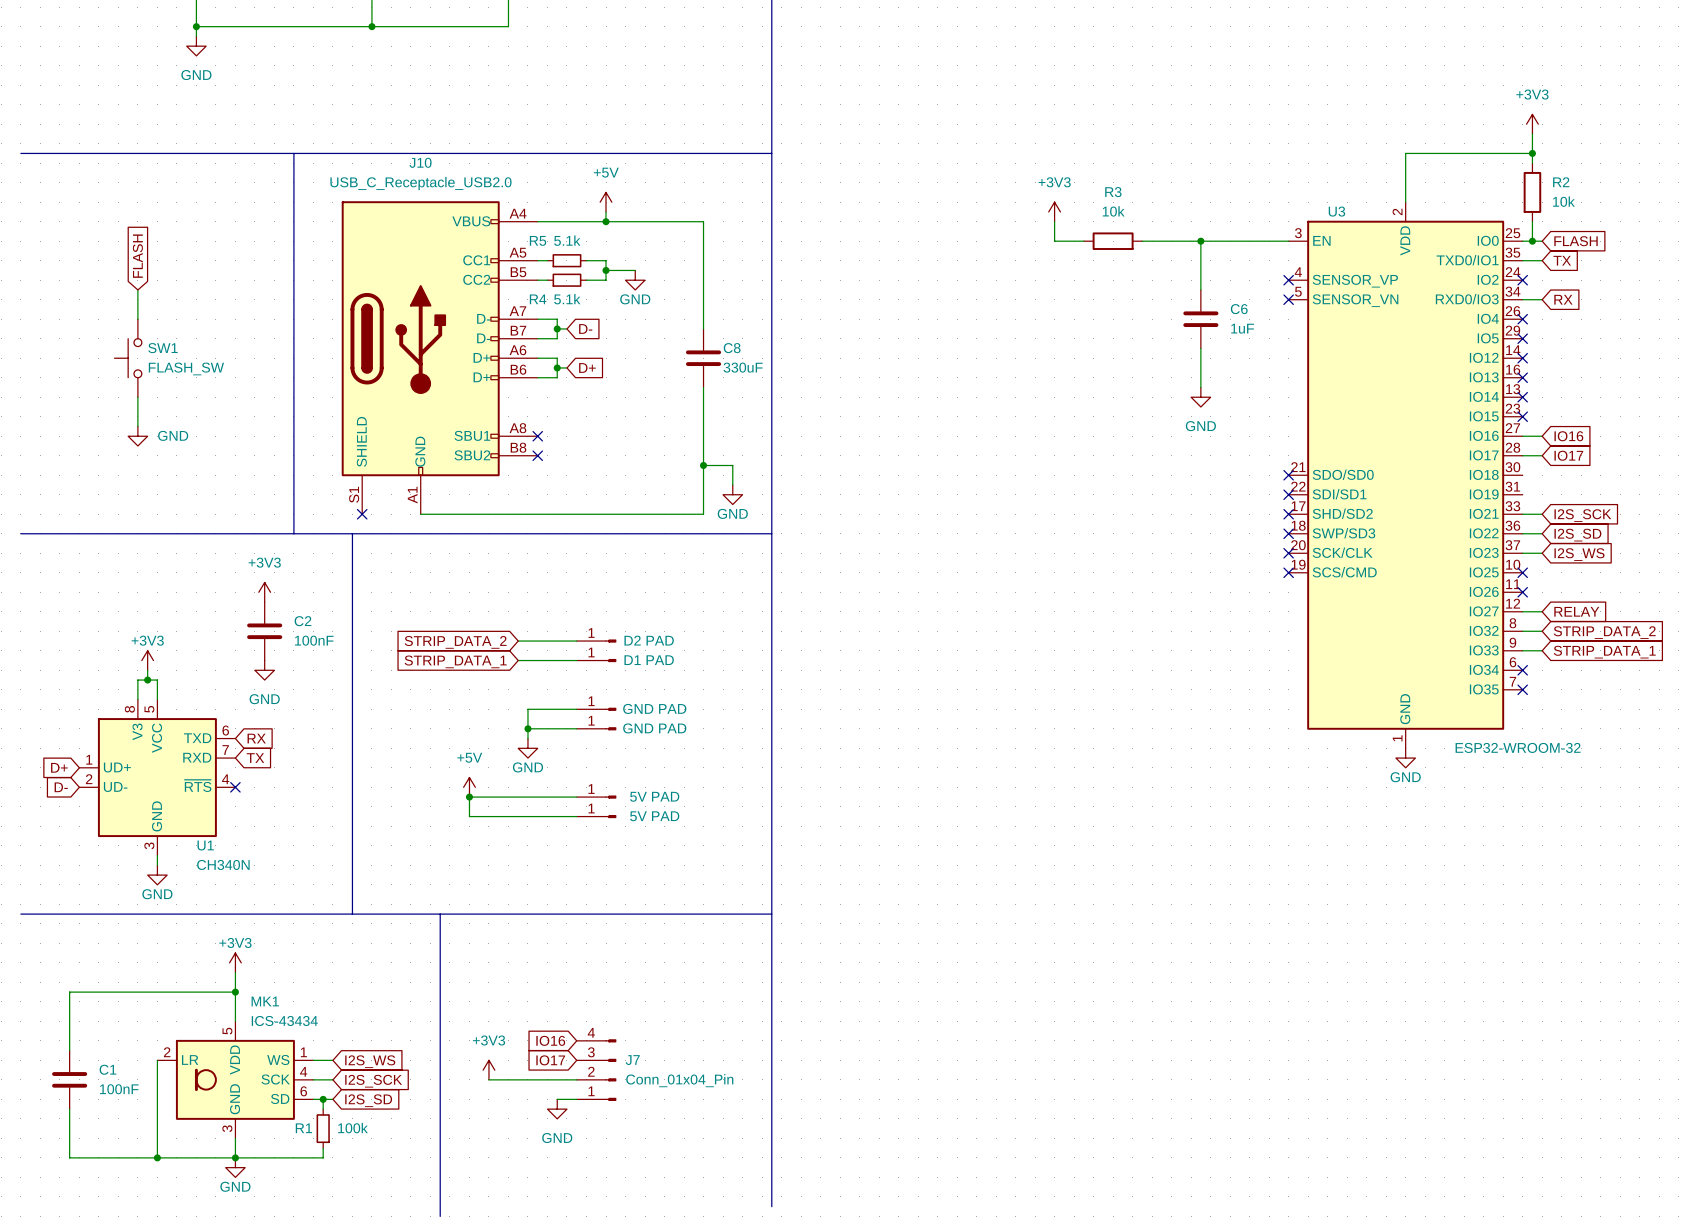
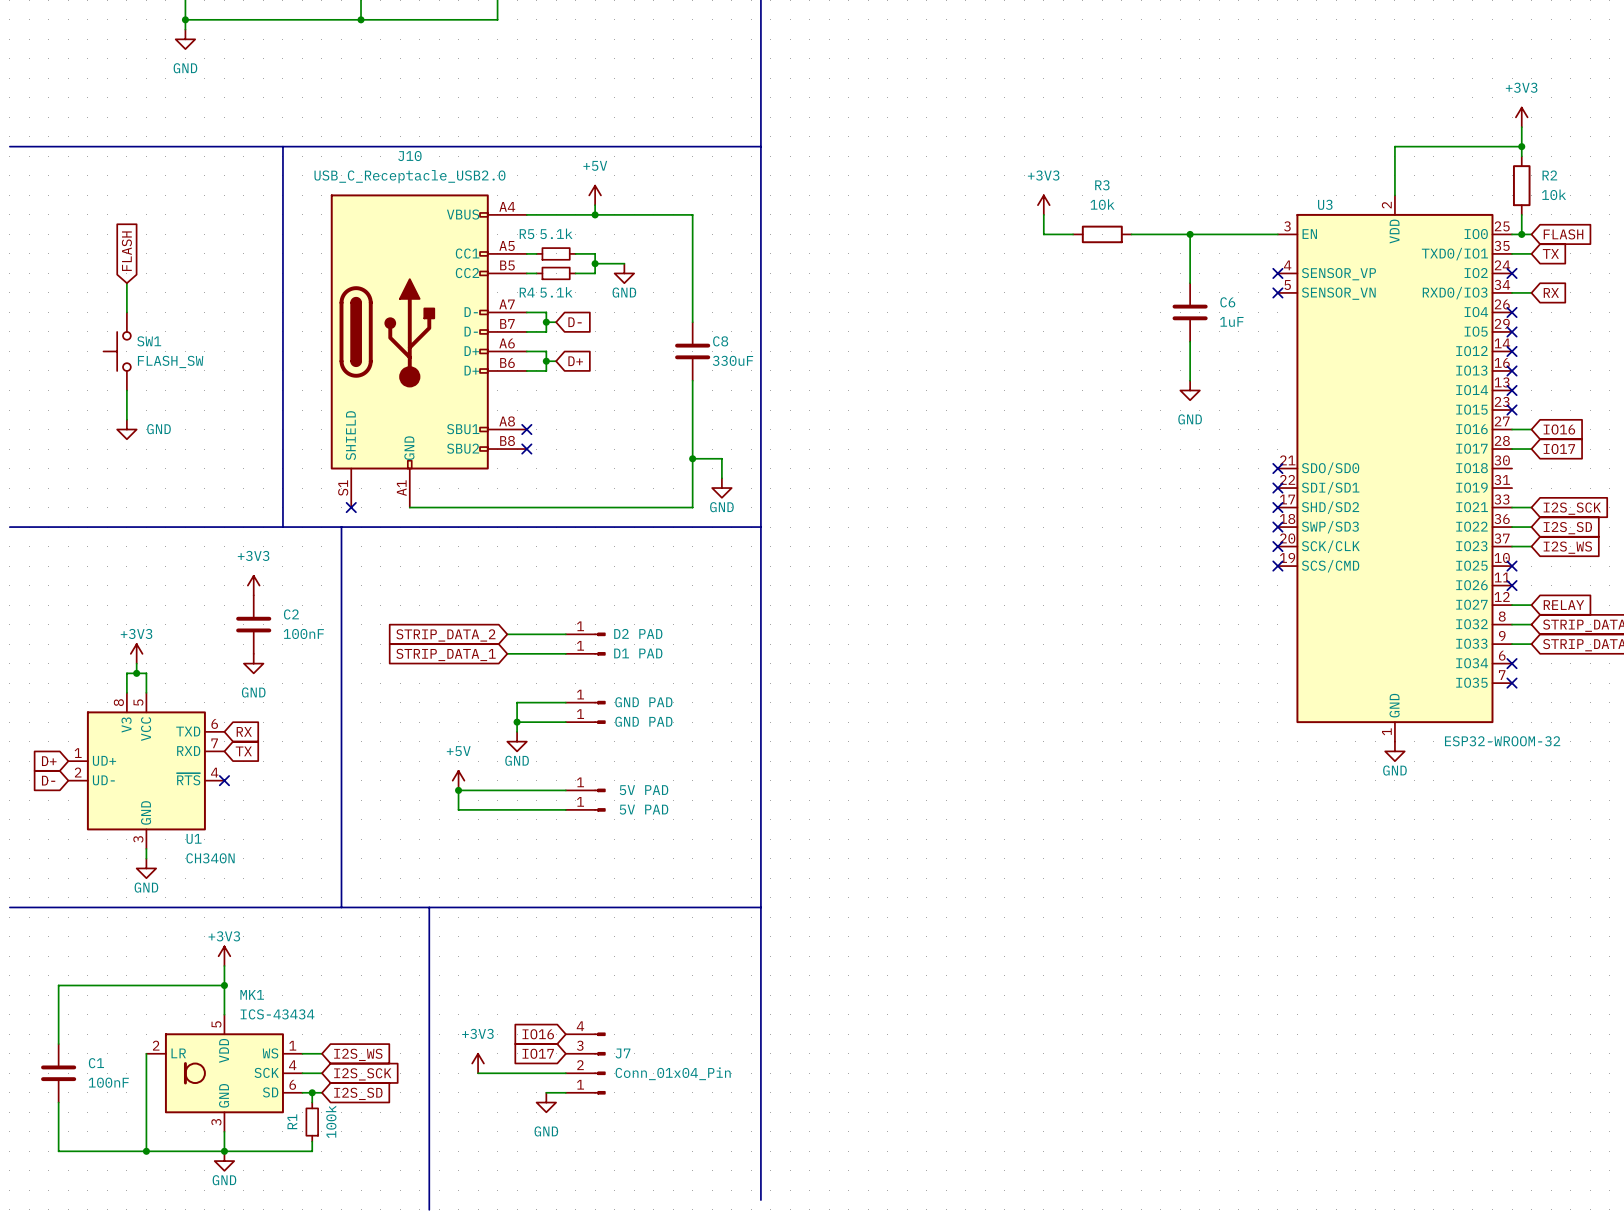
R1 name rotation: 0° (303, 1128) -> 90° counterclockwise (292, 1121)
R1 value rotation: 0° (352, 1128) -> 90° counterclockwise (331, 1121)

